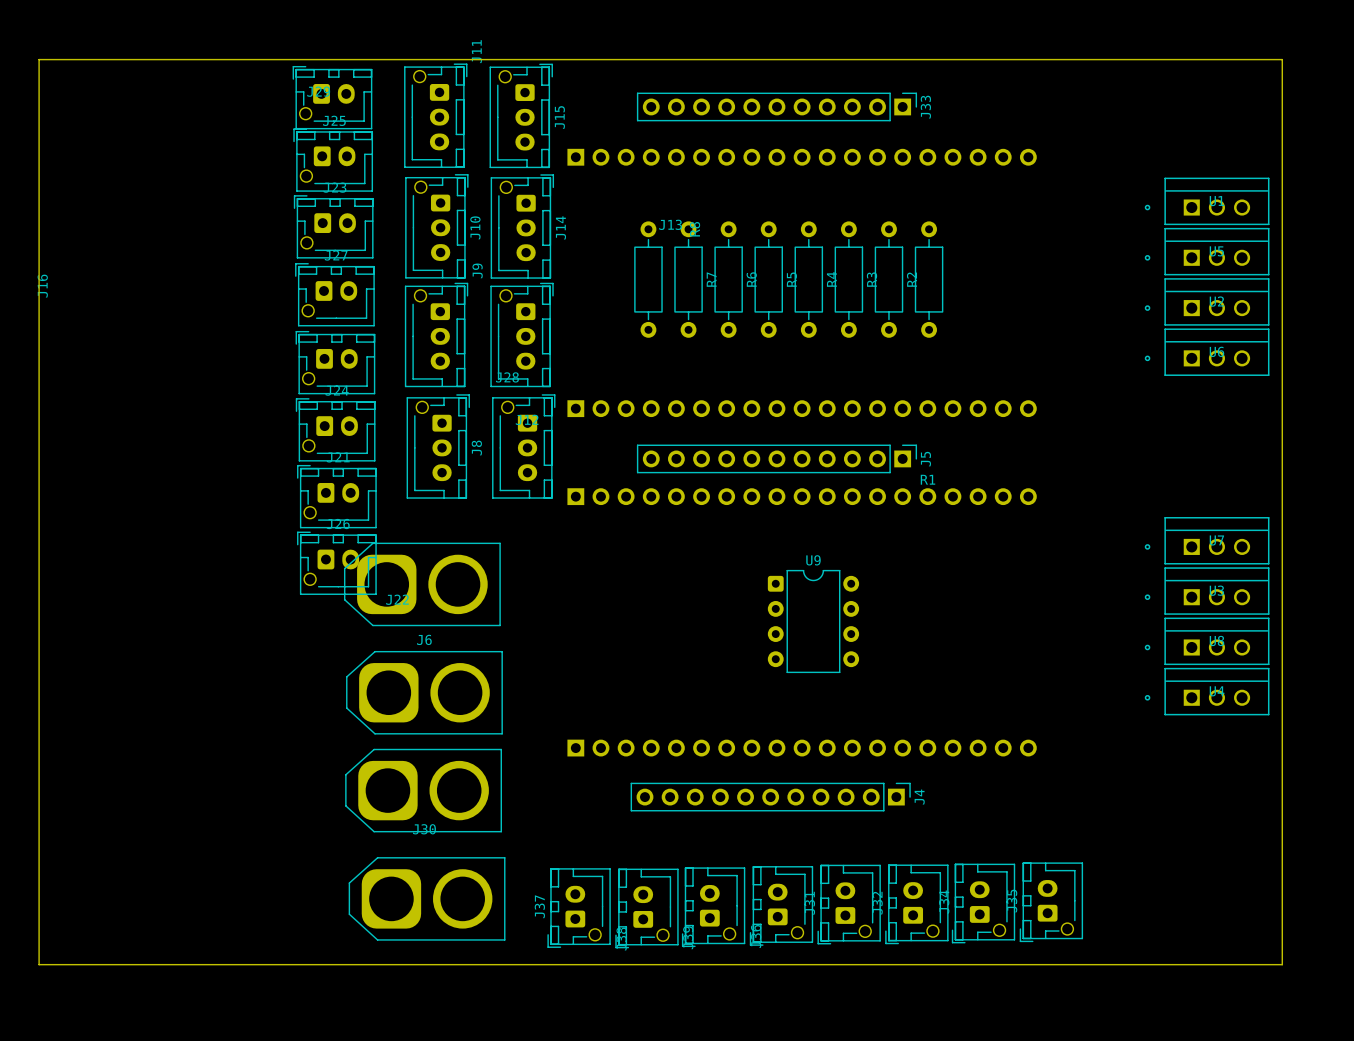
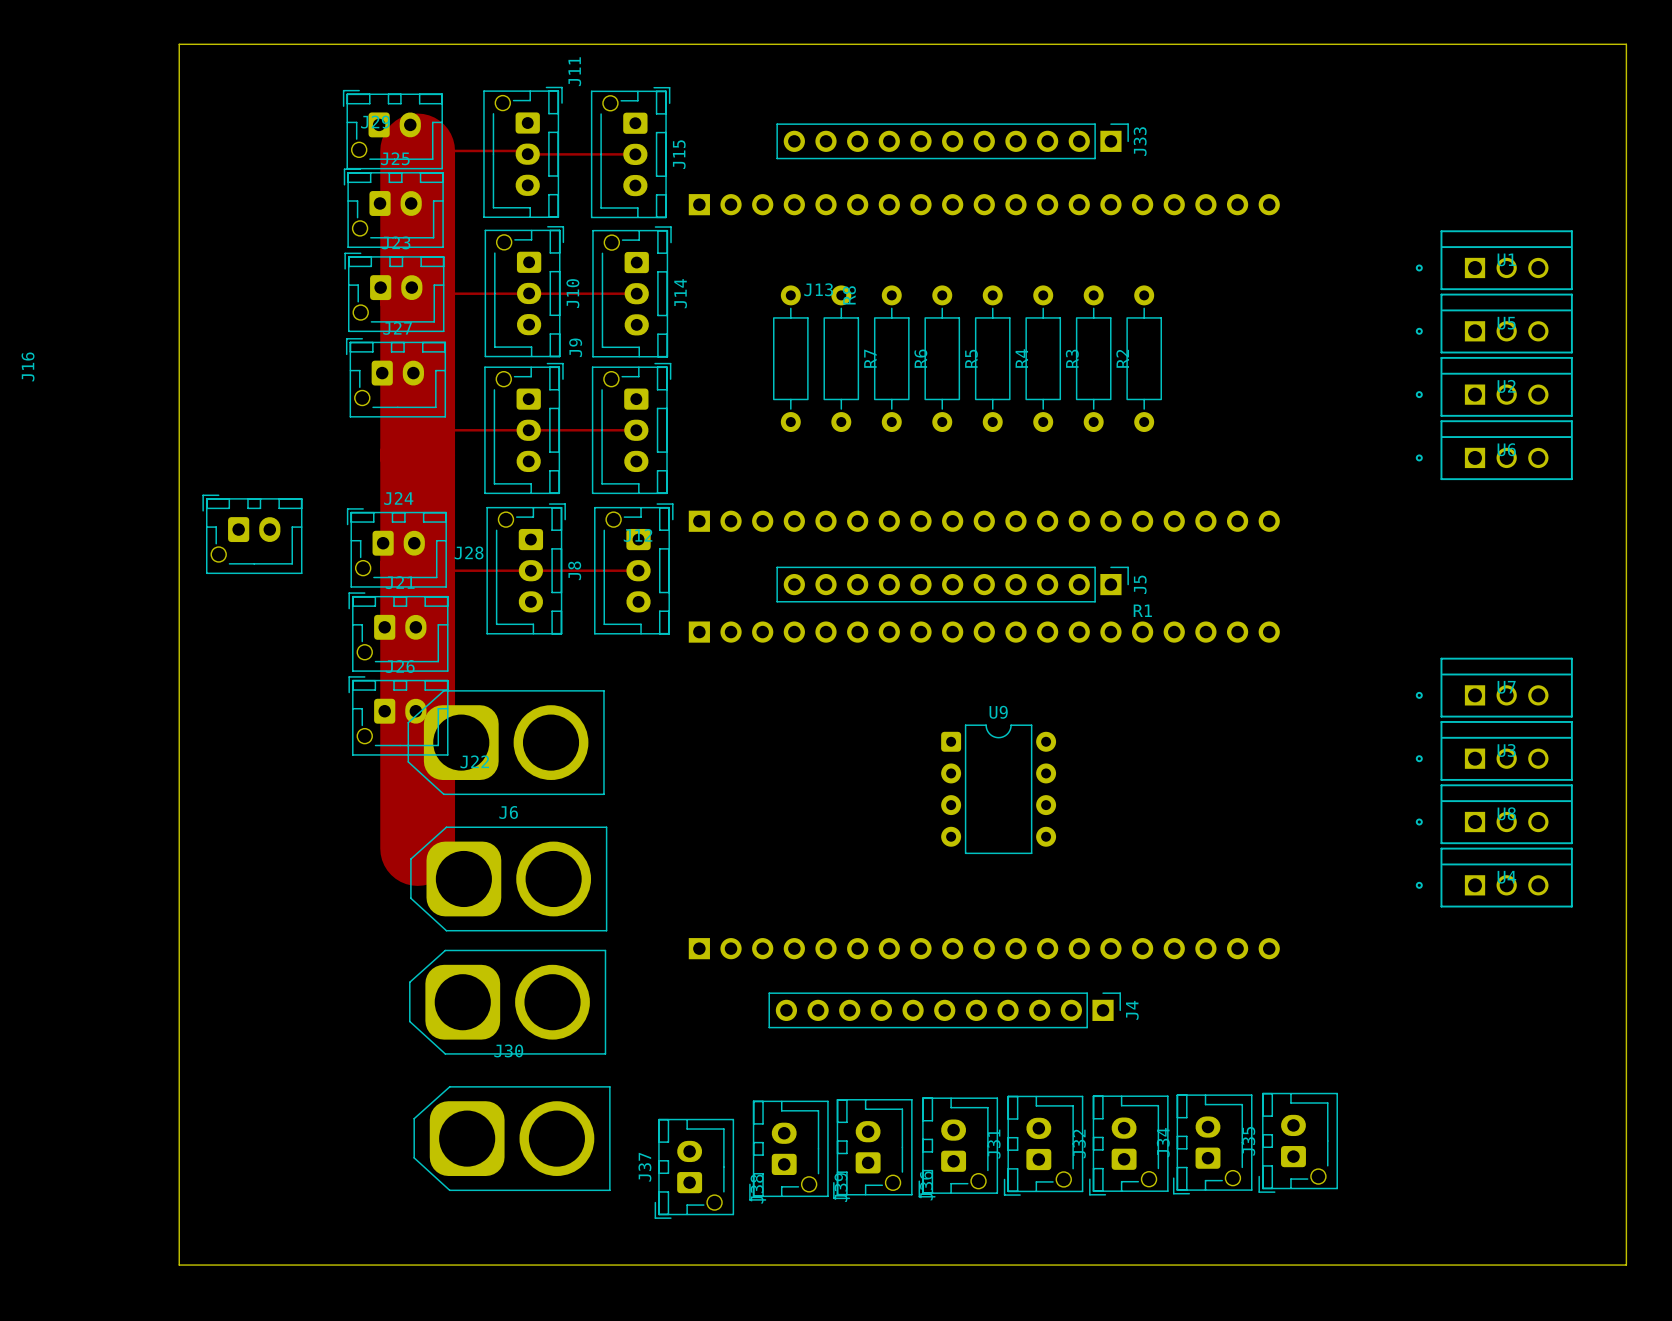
board edge: (39, 59) (1282, 59) (1282, 964) (39, 964) (39, 59) -> (179, 44) (179, 1265) (1626, 1265) (1626, 44) (179, 44)
top track: none -> (417, 150) (529, 150) (533, 154) (635, 154)
top track: none -> (417, 150) (417, 848)
top track: none -> (636, 293) (423, 293) (417, 299)
top track: none -> (636, 430) (442, 430) (417, 455)
J28 position: (335, 362) -> (252, 534)
top track: none -> (417, 567) (420, 570) (638, 570)
J37 position: (579, 908) -> (694, 1168)

